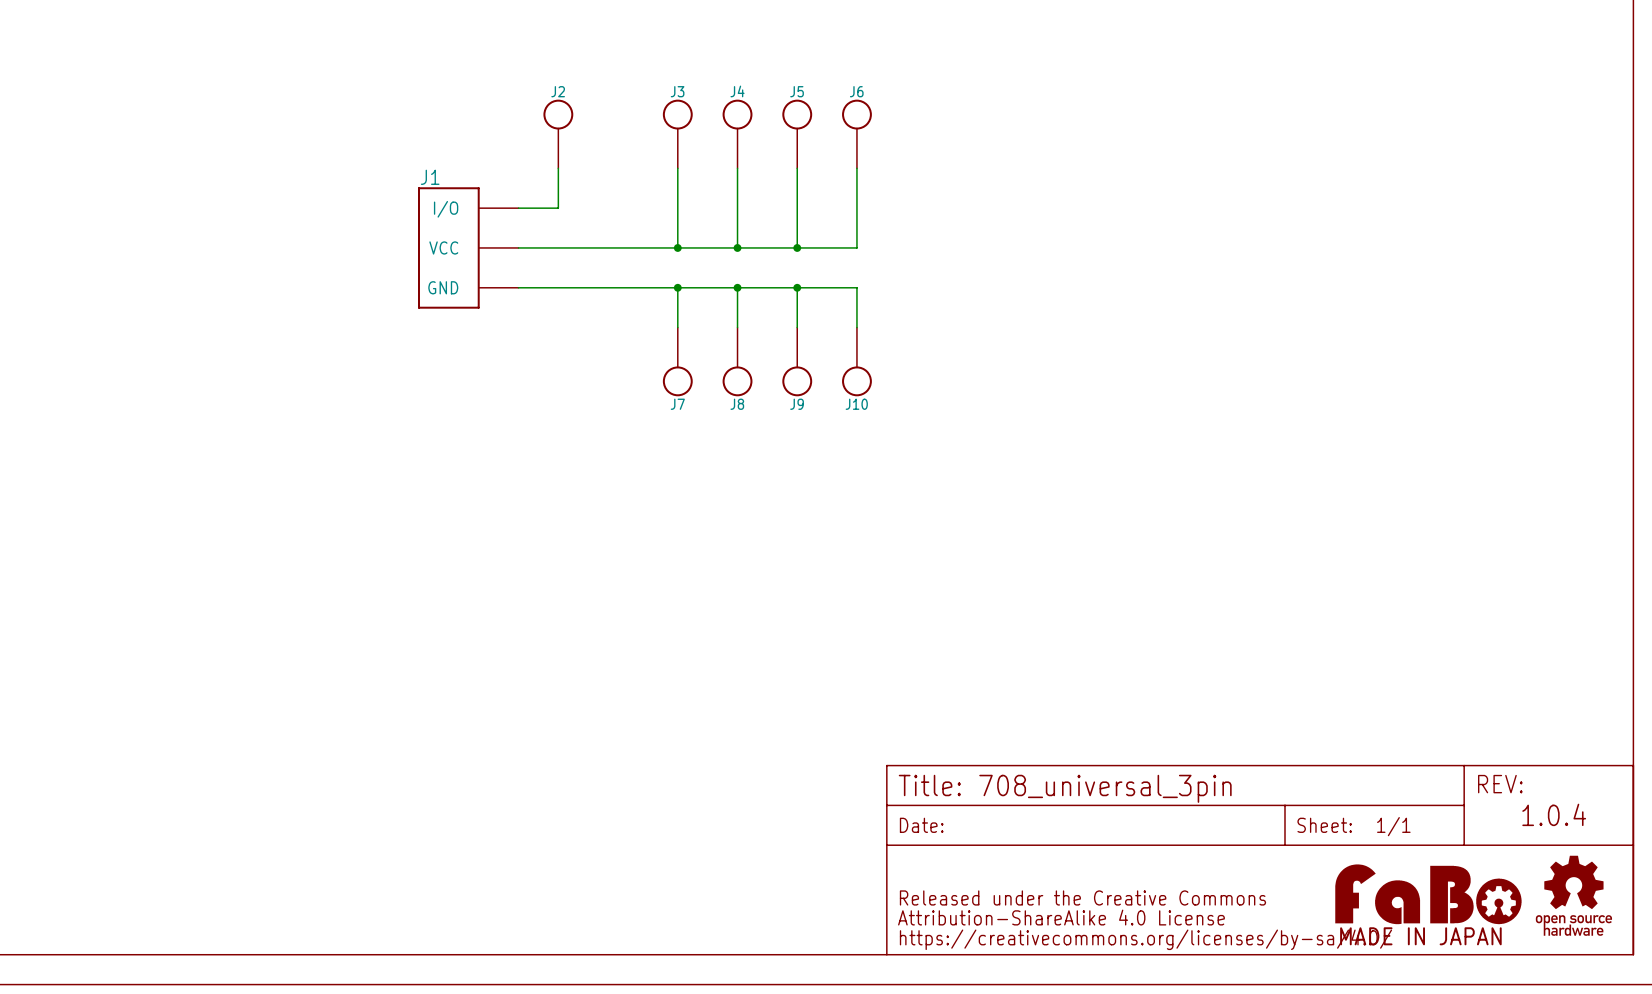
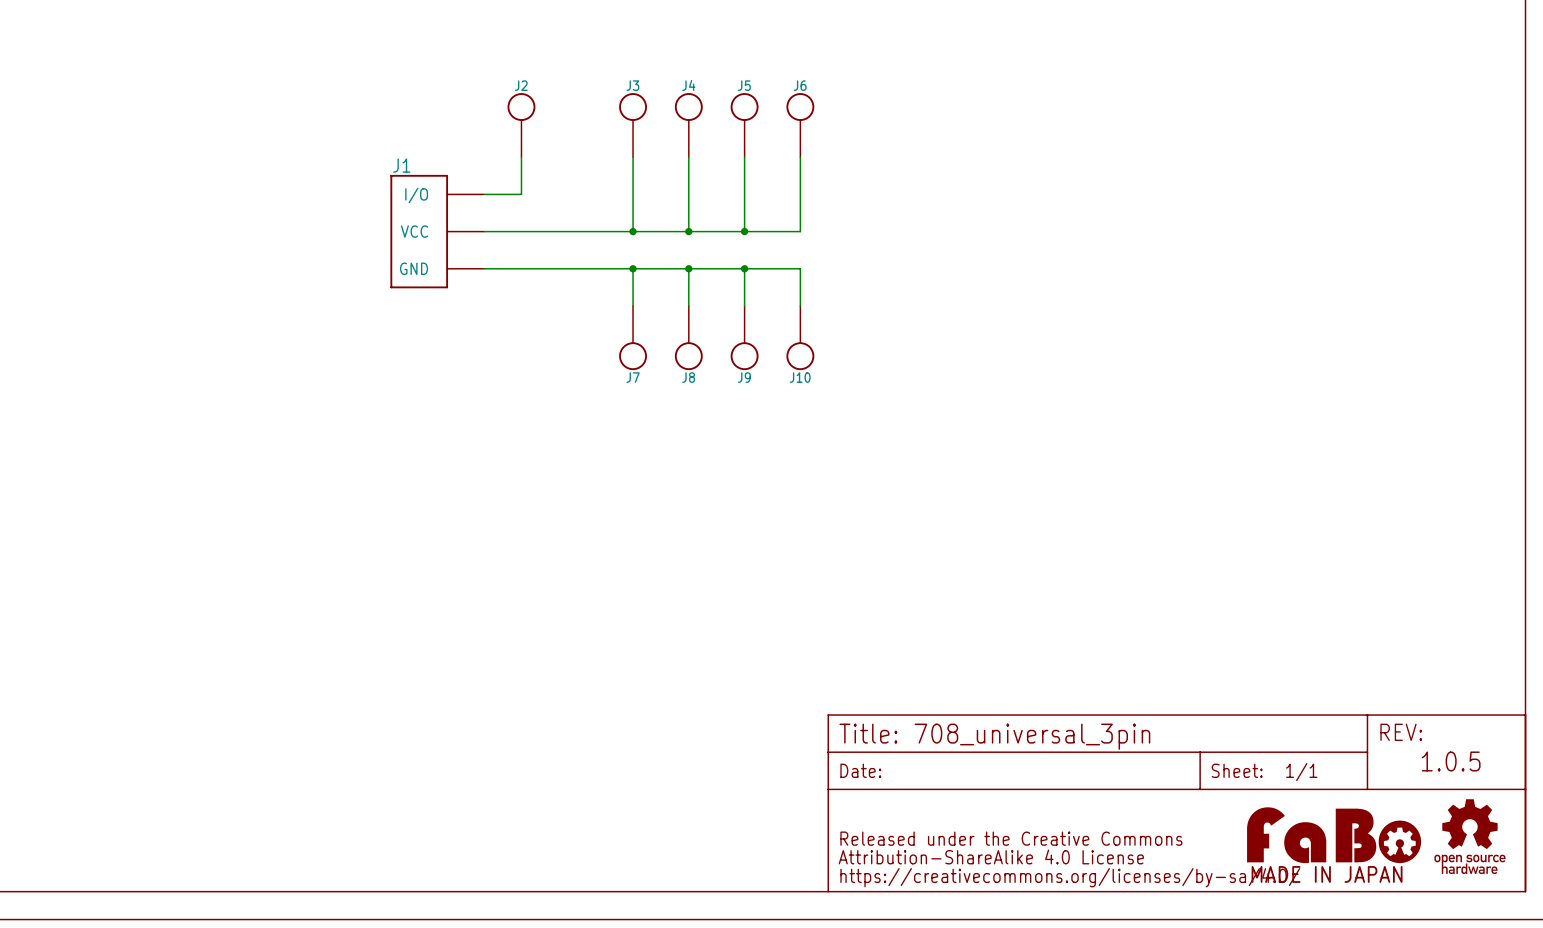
text: 1.0.4 (1554, 814) -> 1.0.5 (1451, 761)

